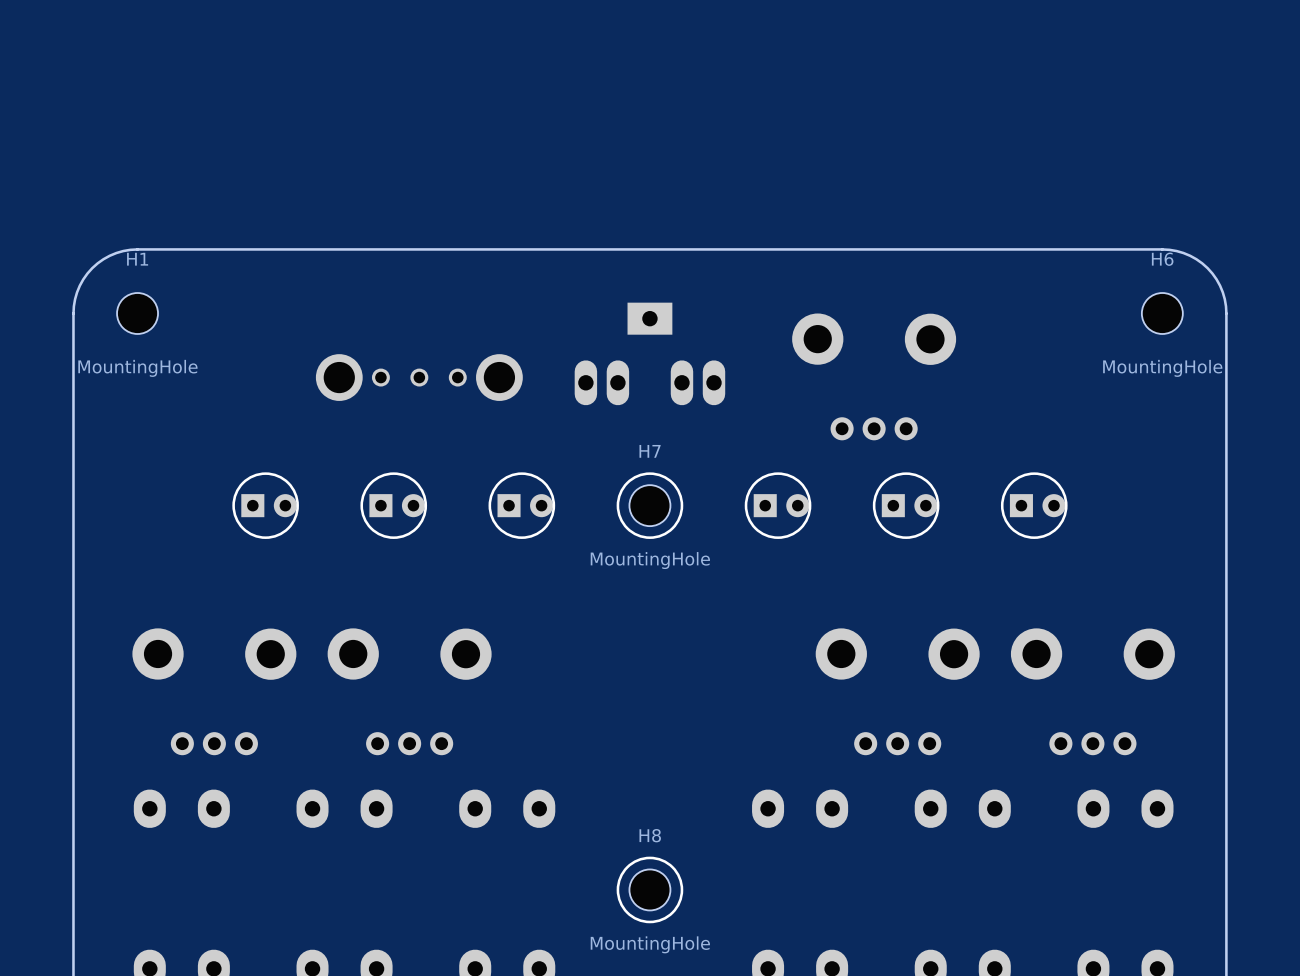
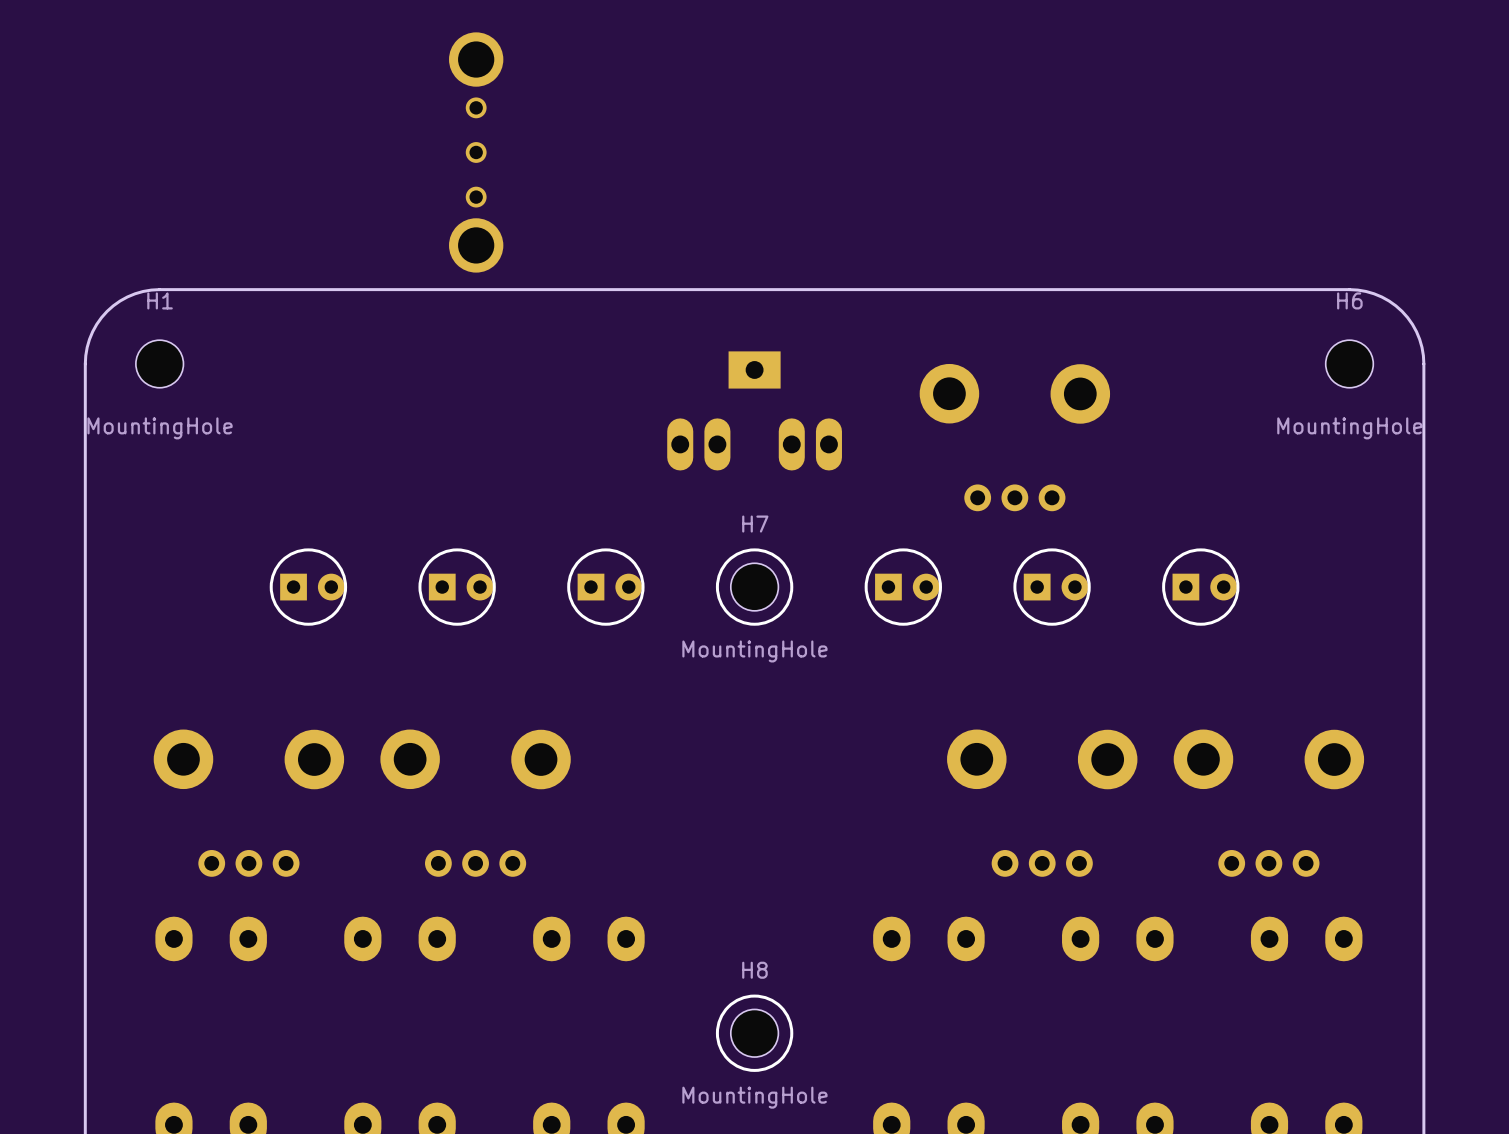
part rotation: 0° (419, 377) -> 90° clockwise (476, 152)
part position: (419, 377) -> (476, 152)

